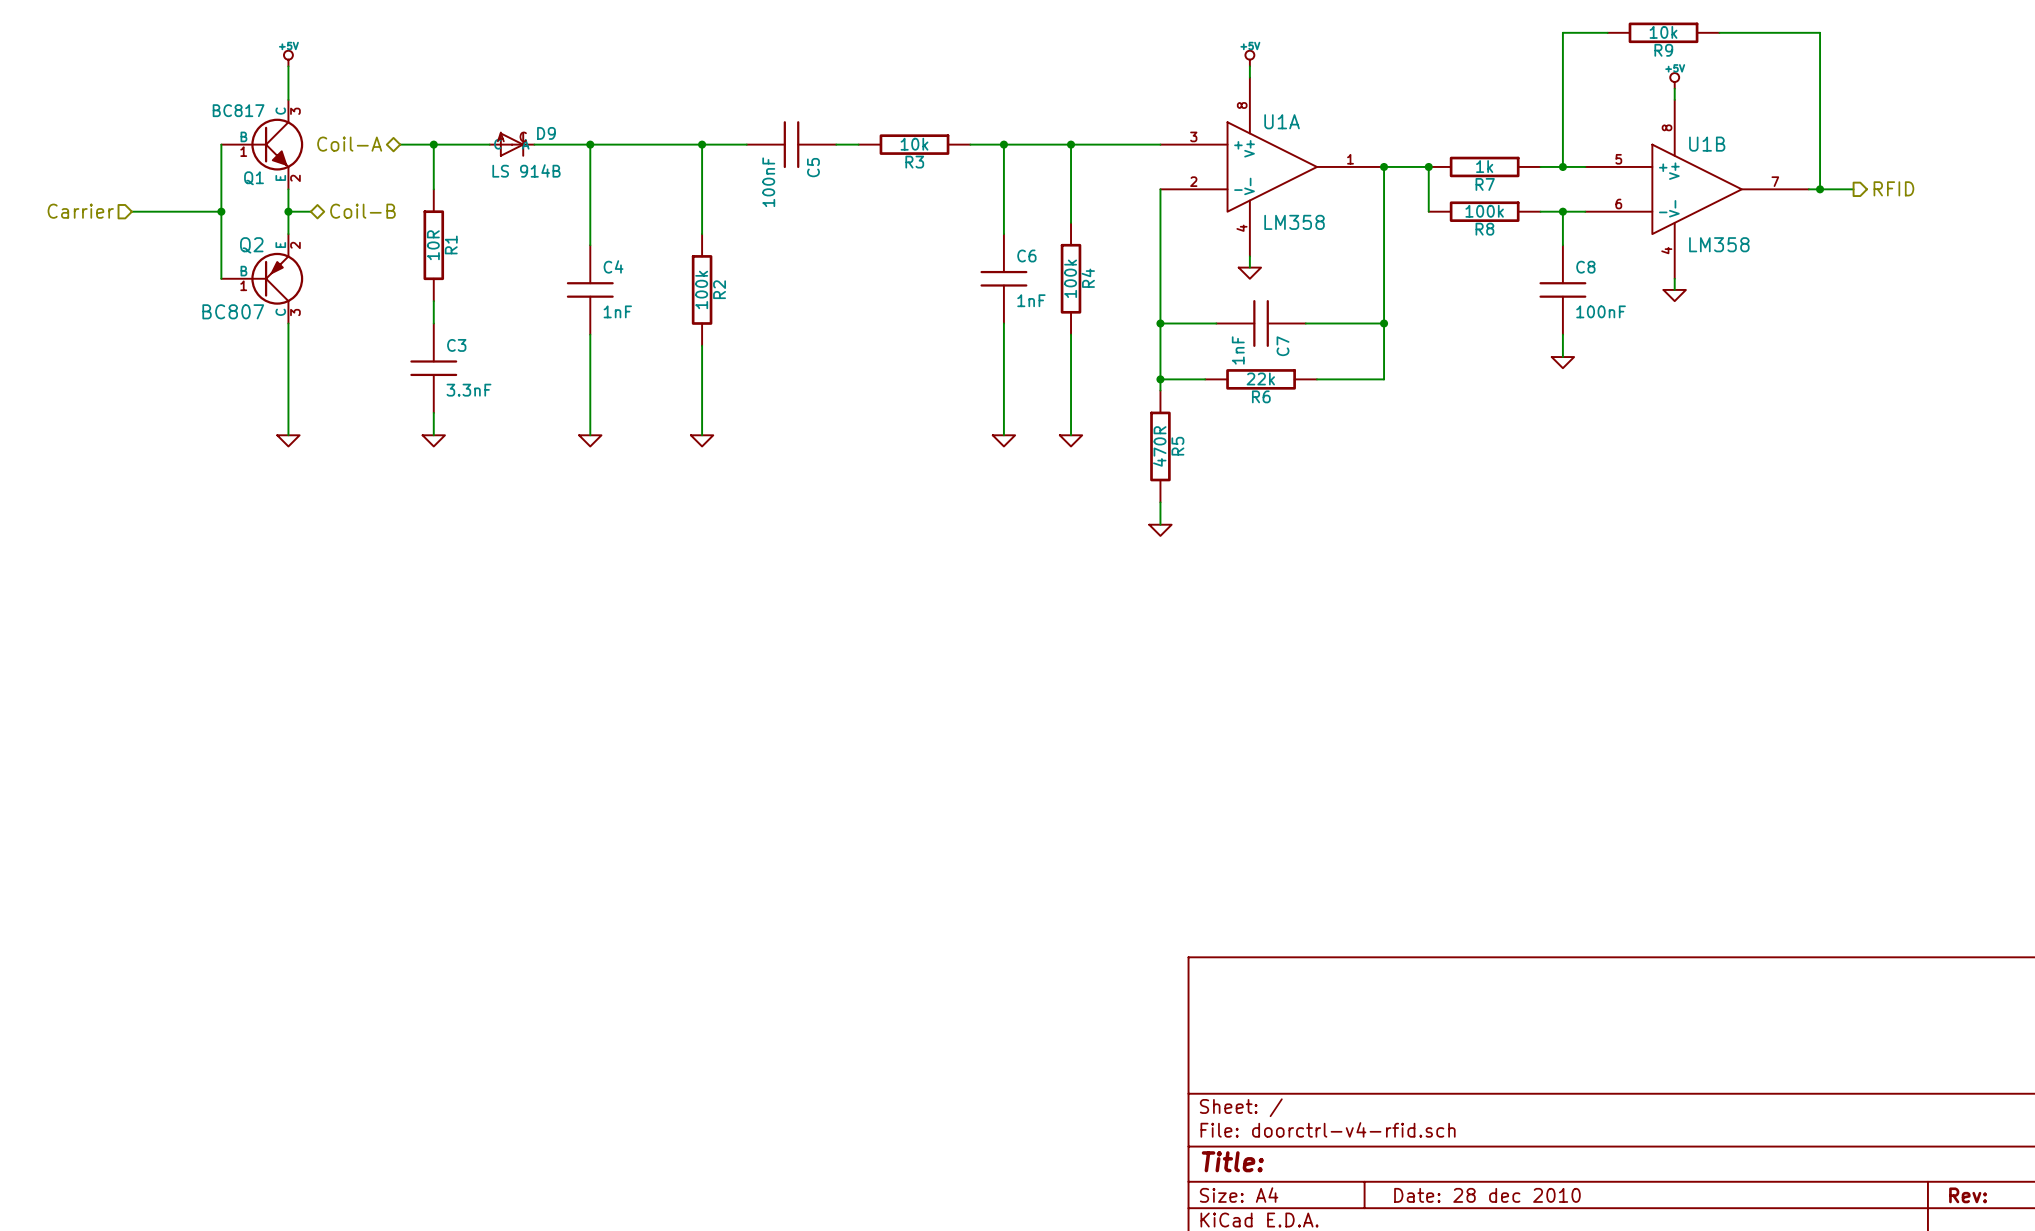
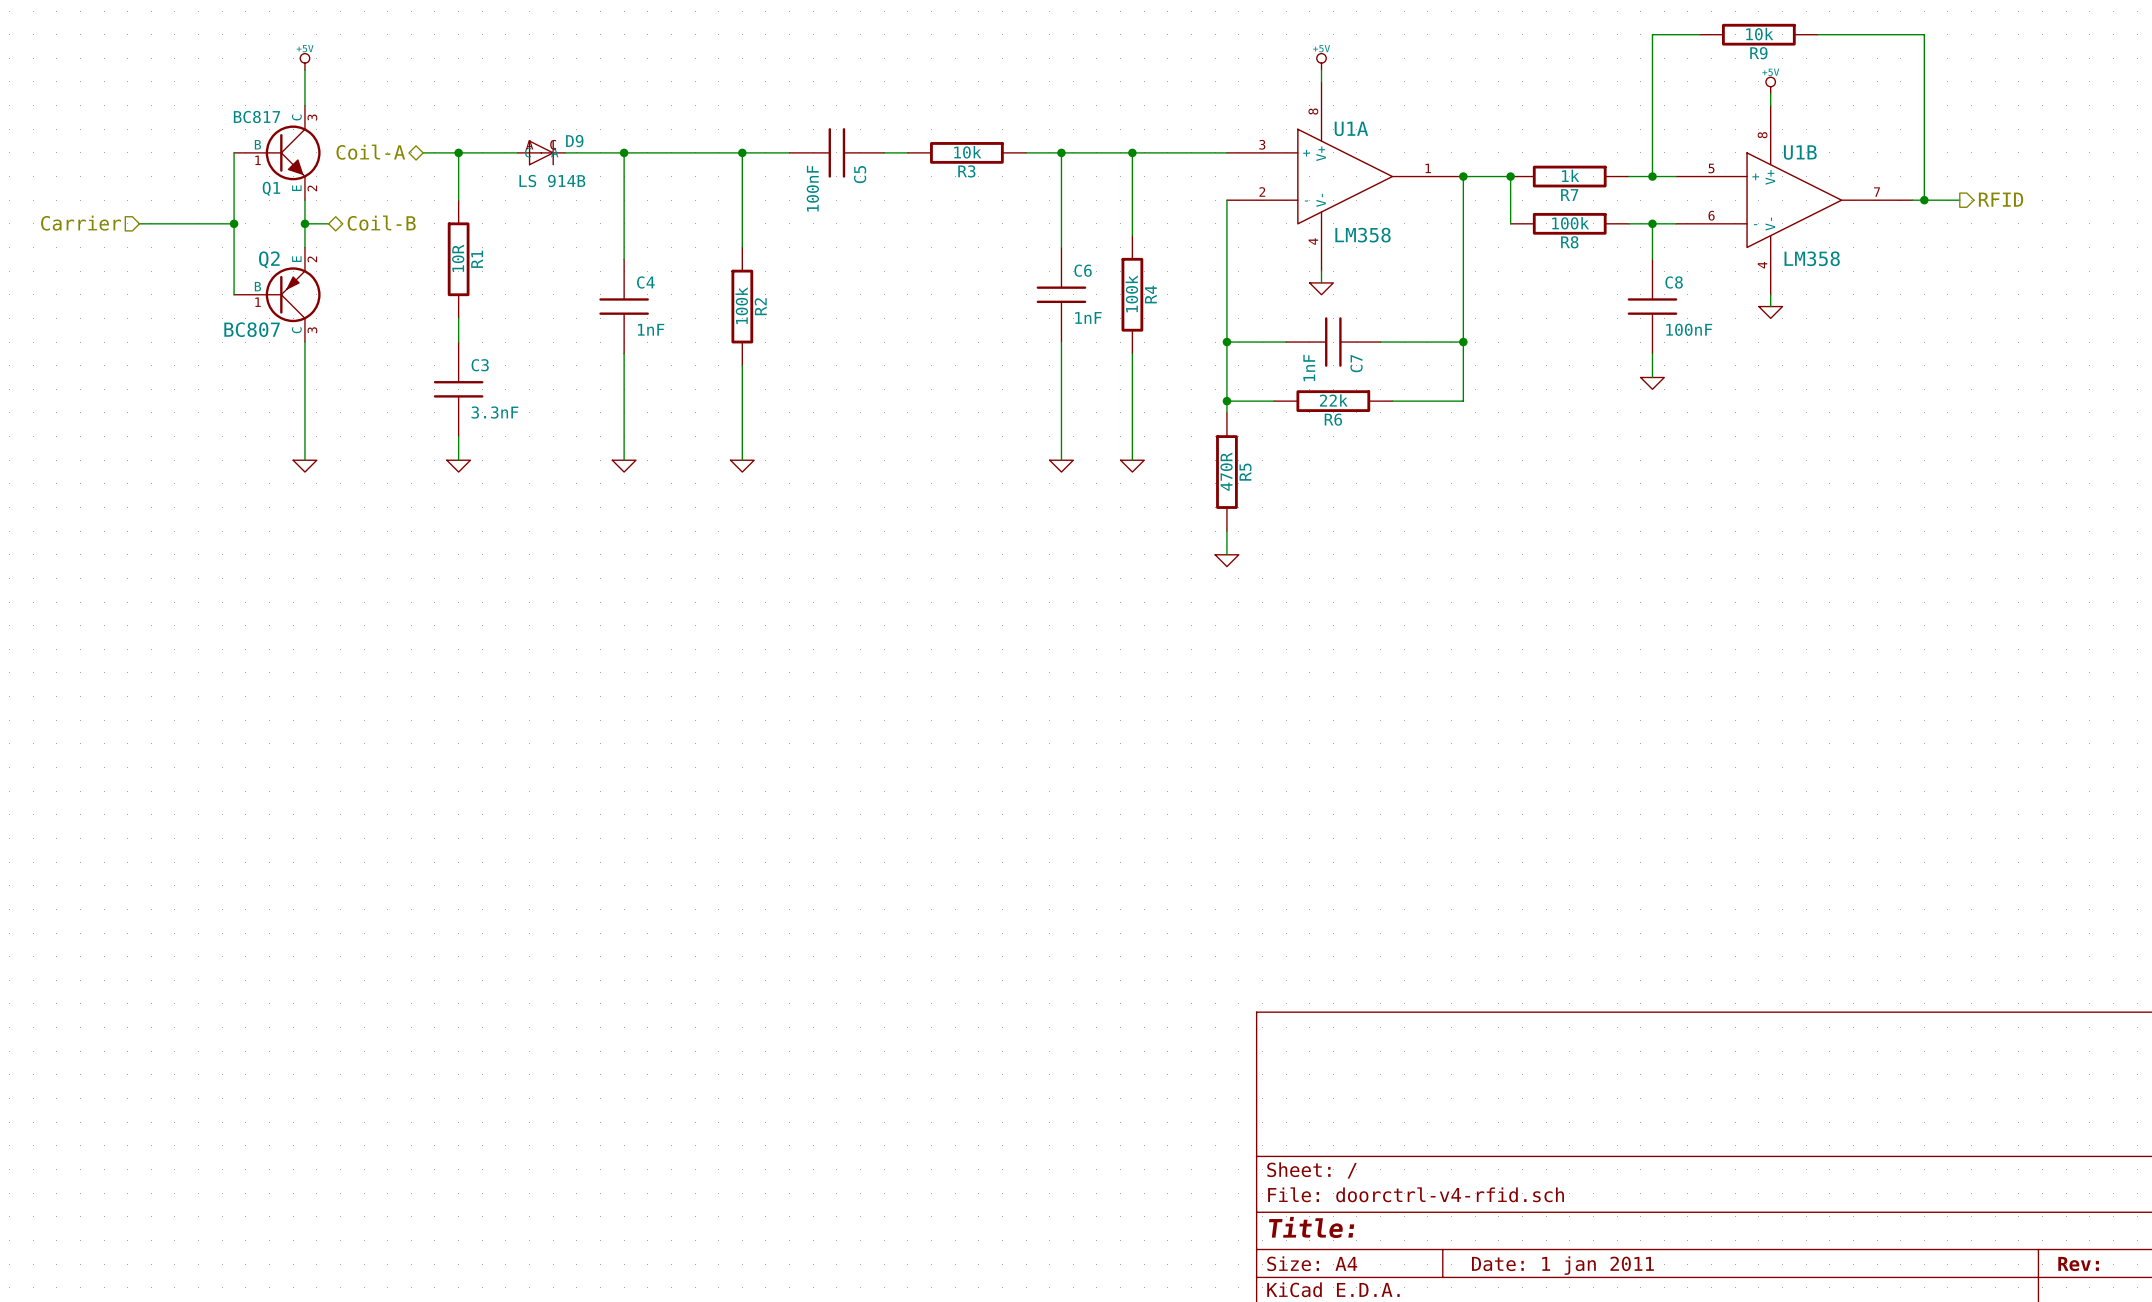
title block: Date: 28 dec 2010 (1487, 1195) -> Date: 1 jan 2011 (1562, 1265)

